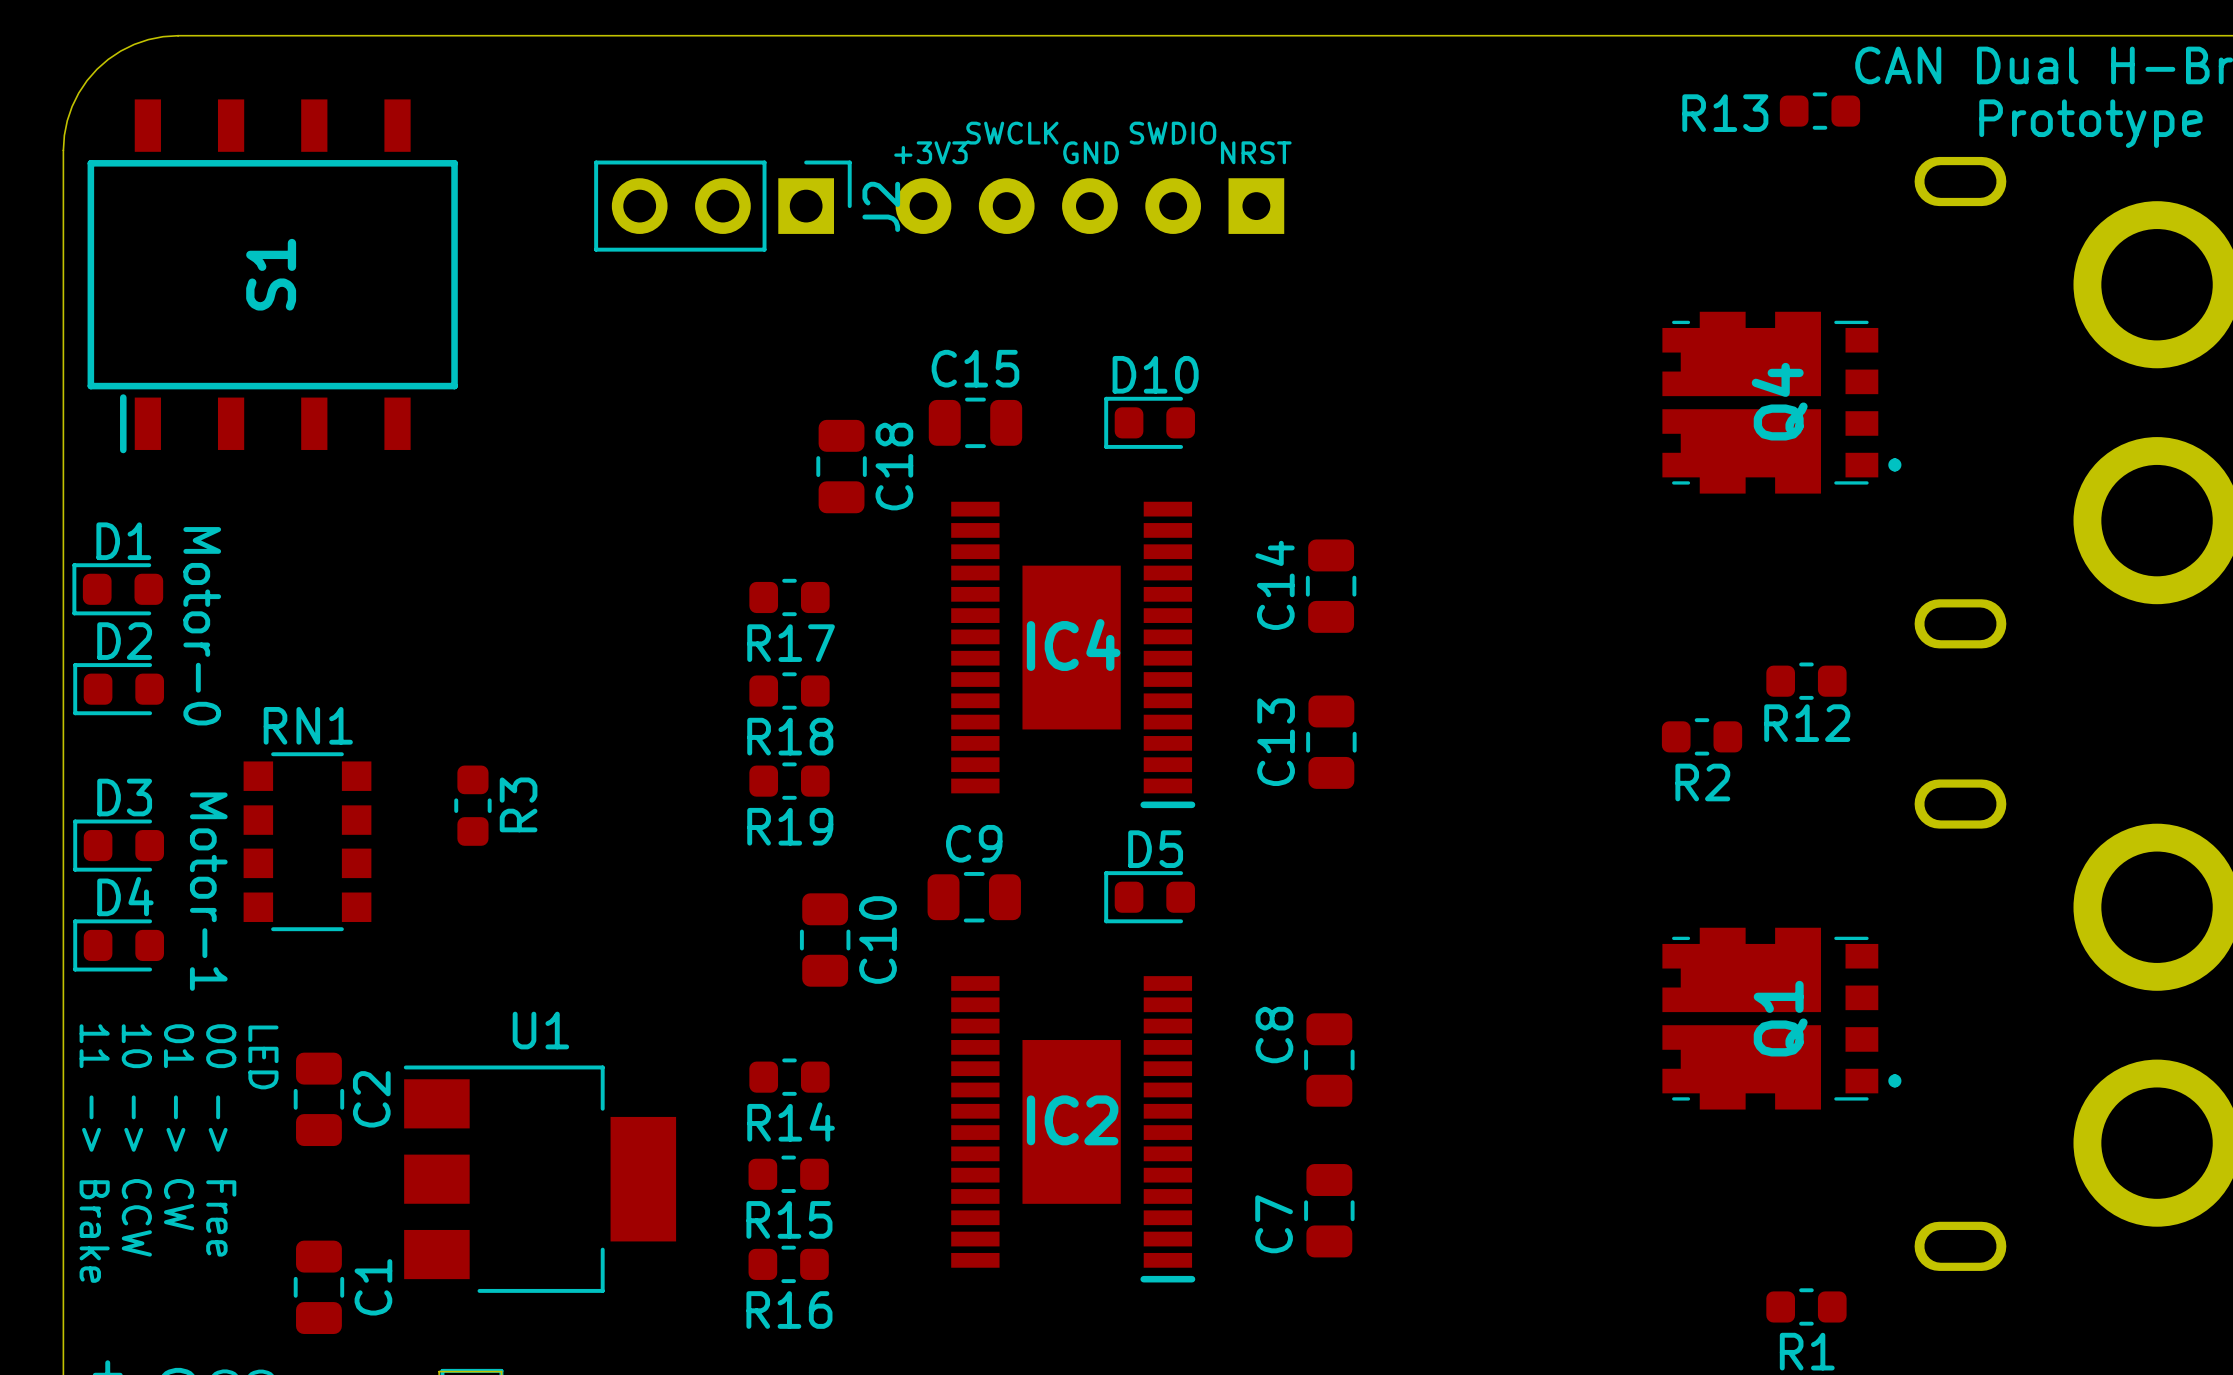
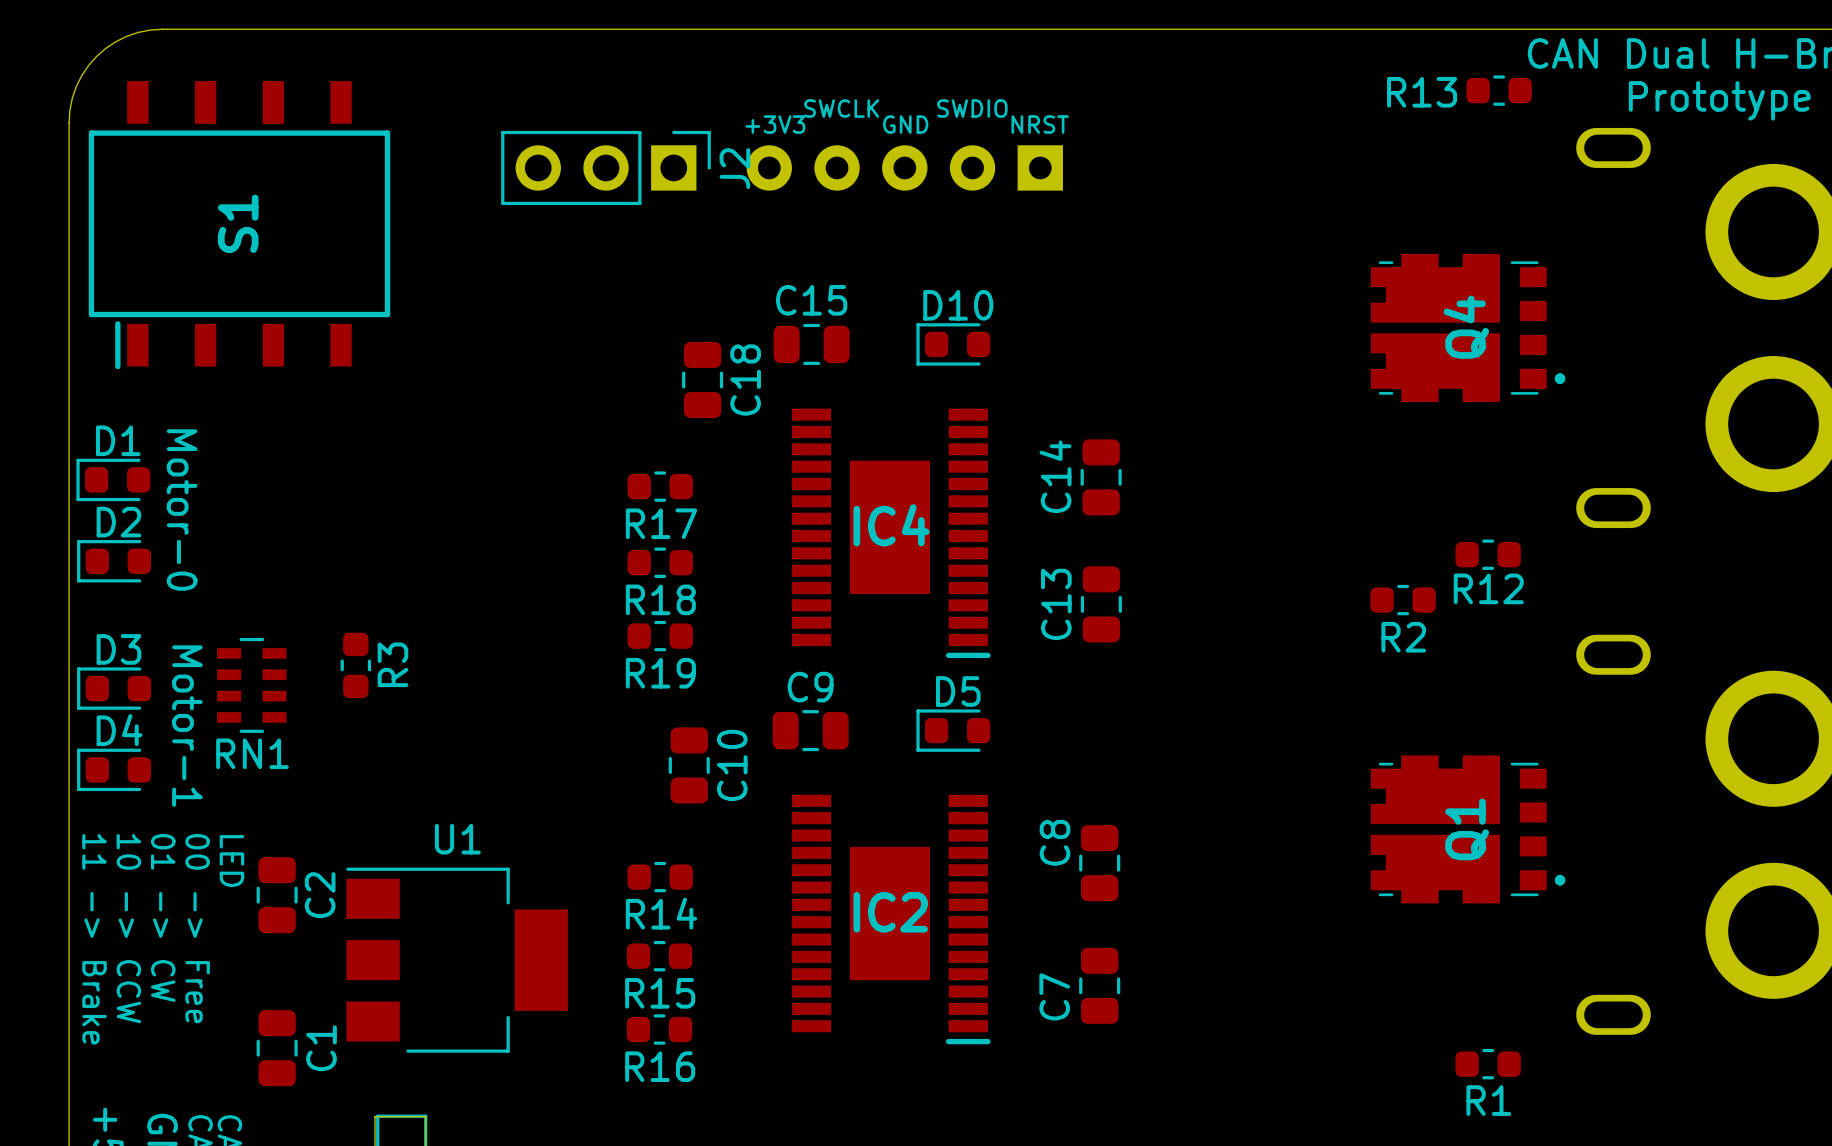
RN1 name position: RN1 (308, 725) -> RN1 (252, 753)
RN1 footprint: [243, 752, 372, 932] -> [217, 637, 287, 733]
R3 position: (472, 805) -> (355, 665)

